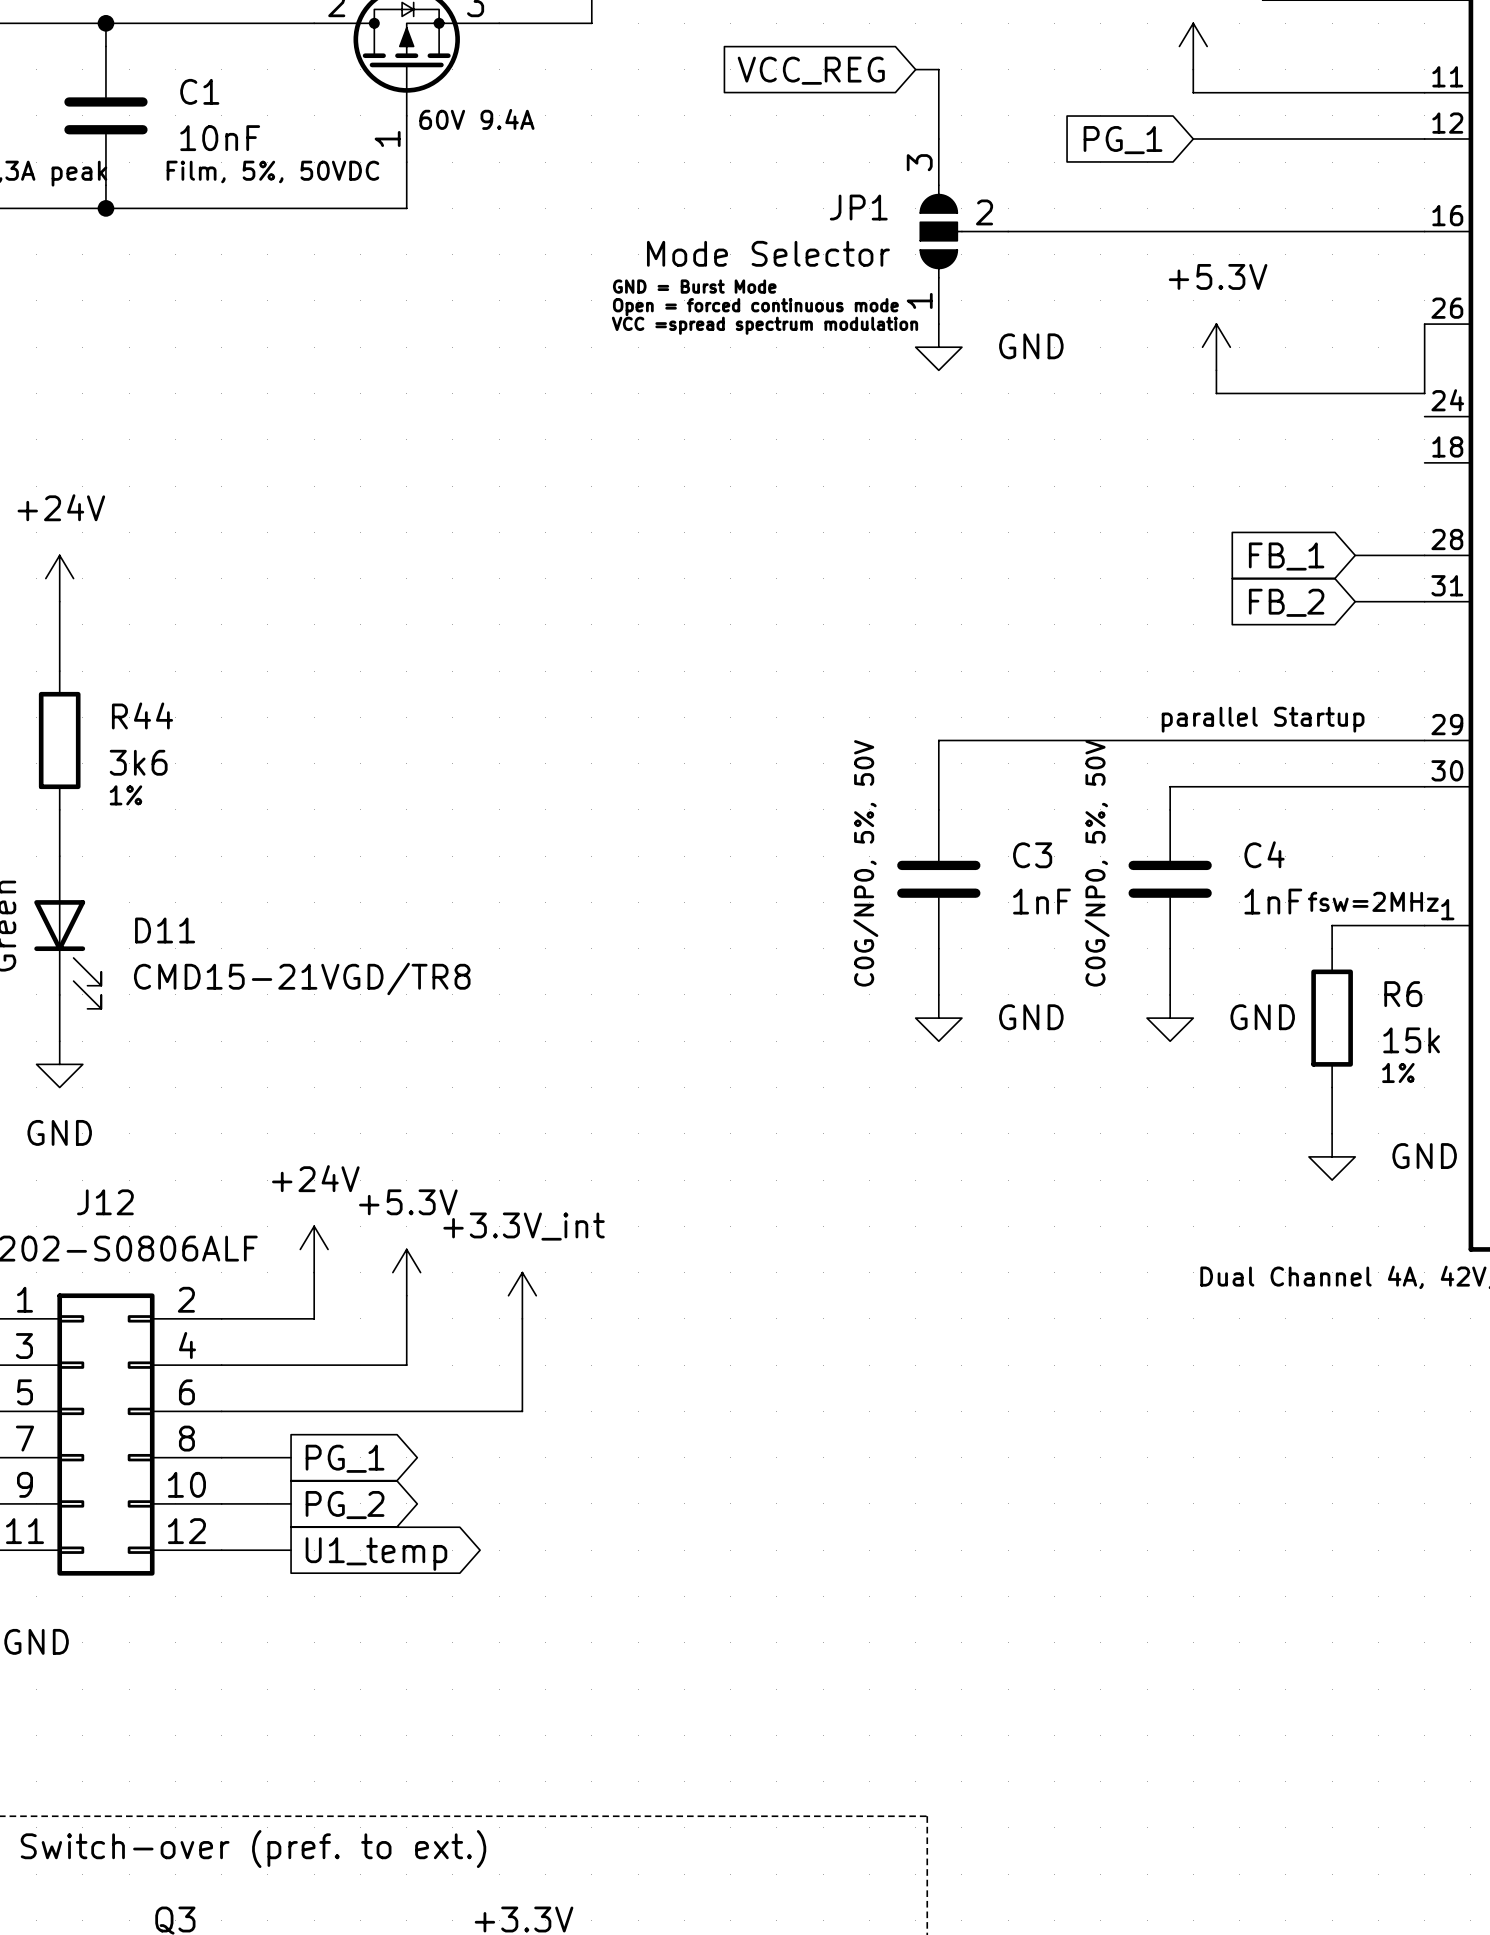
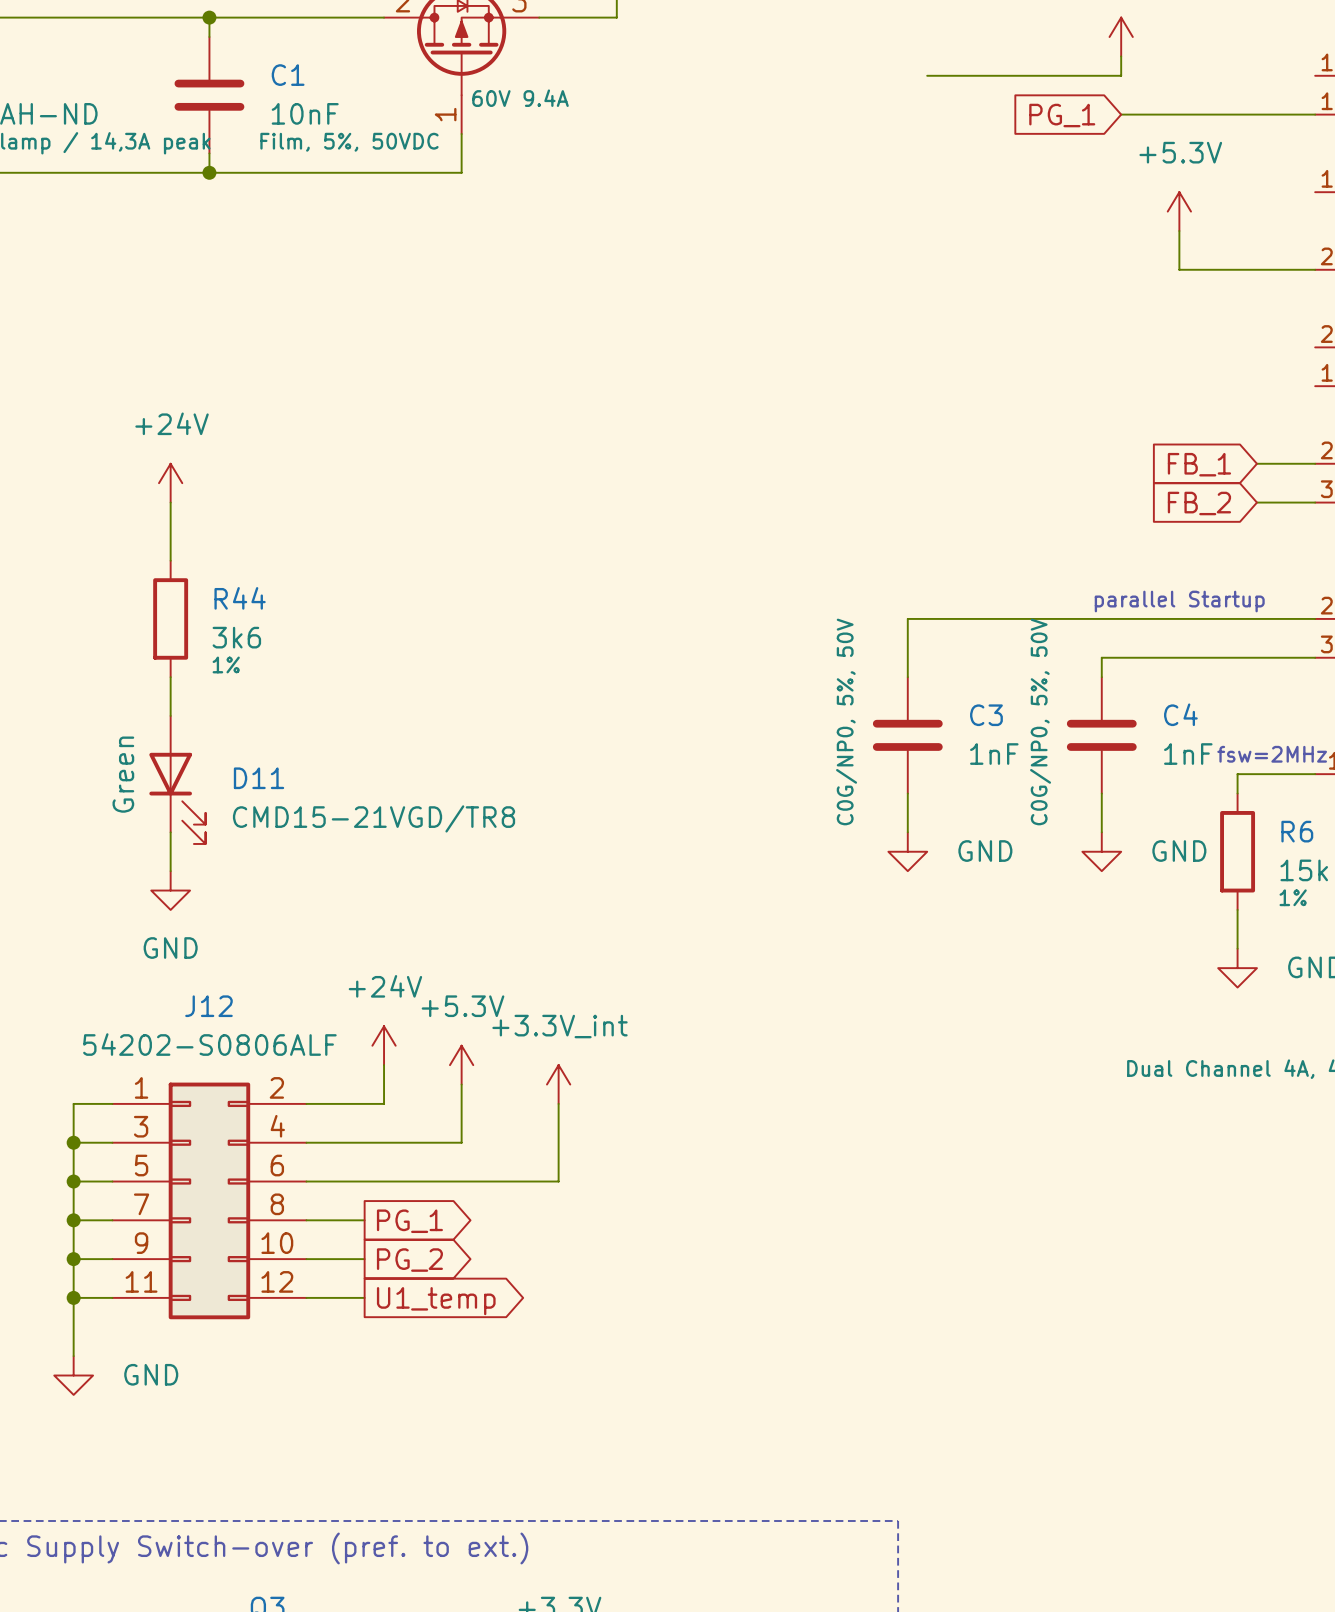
wire: (915, 69) (938, 69) (938, 138) -> none
global label: VCC_REG (811, 70) -> none
wire: (1193, 92) (1424, 92) -> (1121, 75) (927, 75)
JP1: Mode Selector (964, 231) -> none
wire: (1008, 231) (1424, 231) -> none
text: GND = Burst Mode (694, 286) -> none
text: Open = forced continuous mode (755, 307) -> none
wire: (1424, 324) (1424, 393) (1216, 393) (1216, 370) -> (1315, 269) (1179, 269) (1179, 230)
text: VCC =spread spectrum modulation (764, 325) -> none
power symbol: GND (938, 347) -> none
power symbol position: +5.3V (1216, 347) -> +5.3V (1179, 211)

